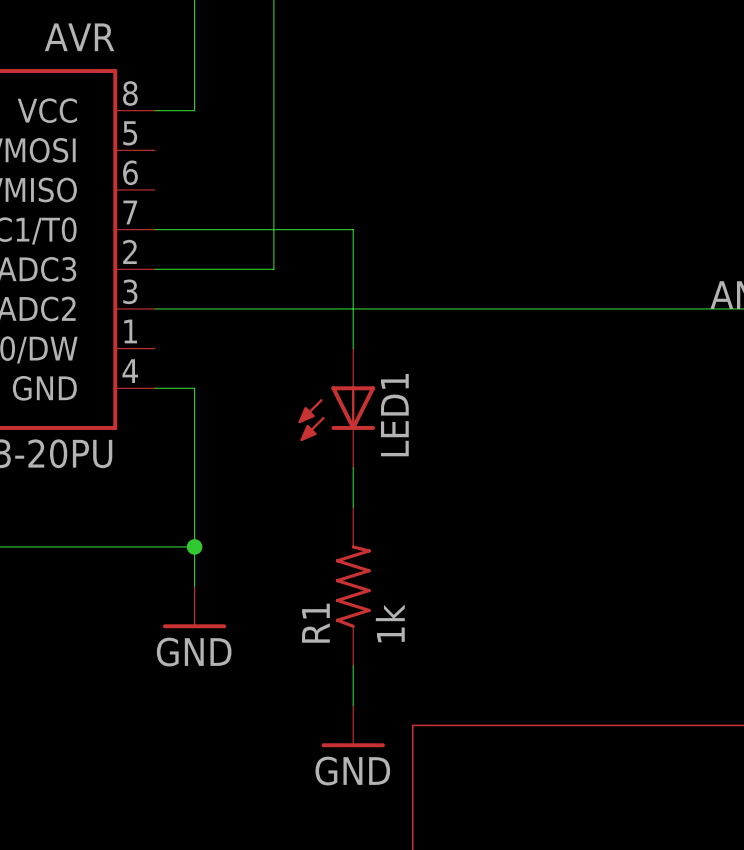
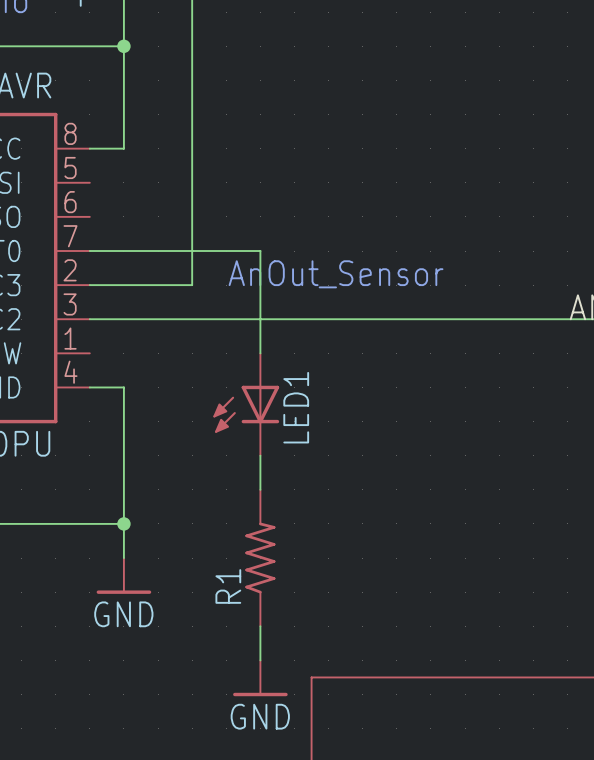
text: none -> AnOut_Sensor (336, 274)
R1 value: 1k (390, 623) -> none

